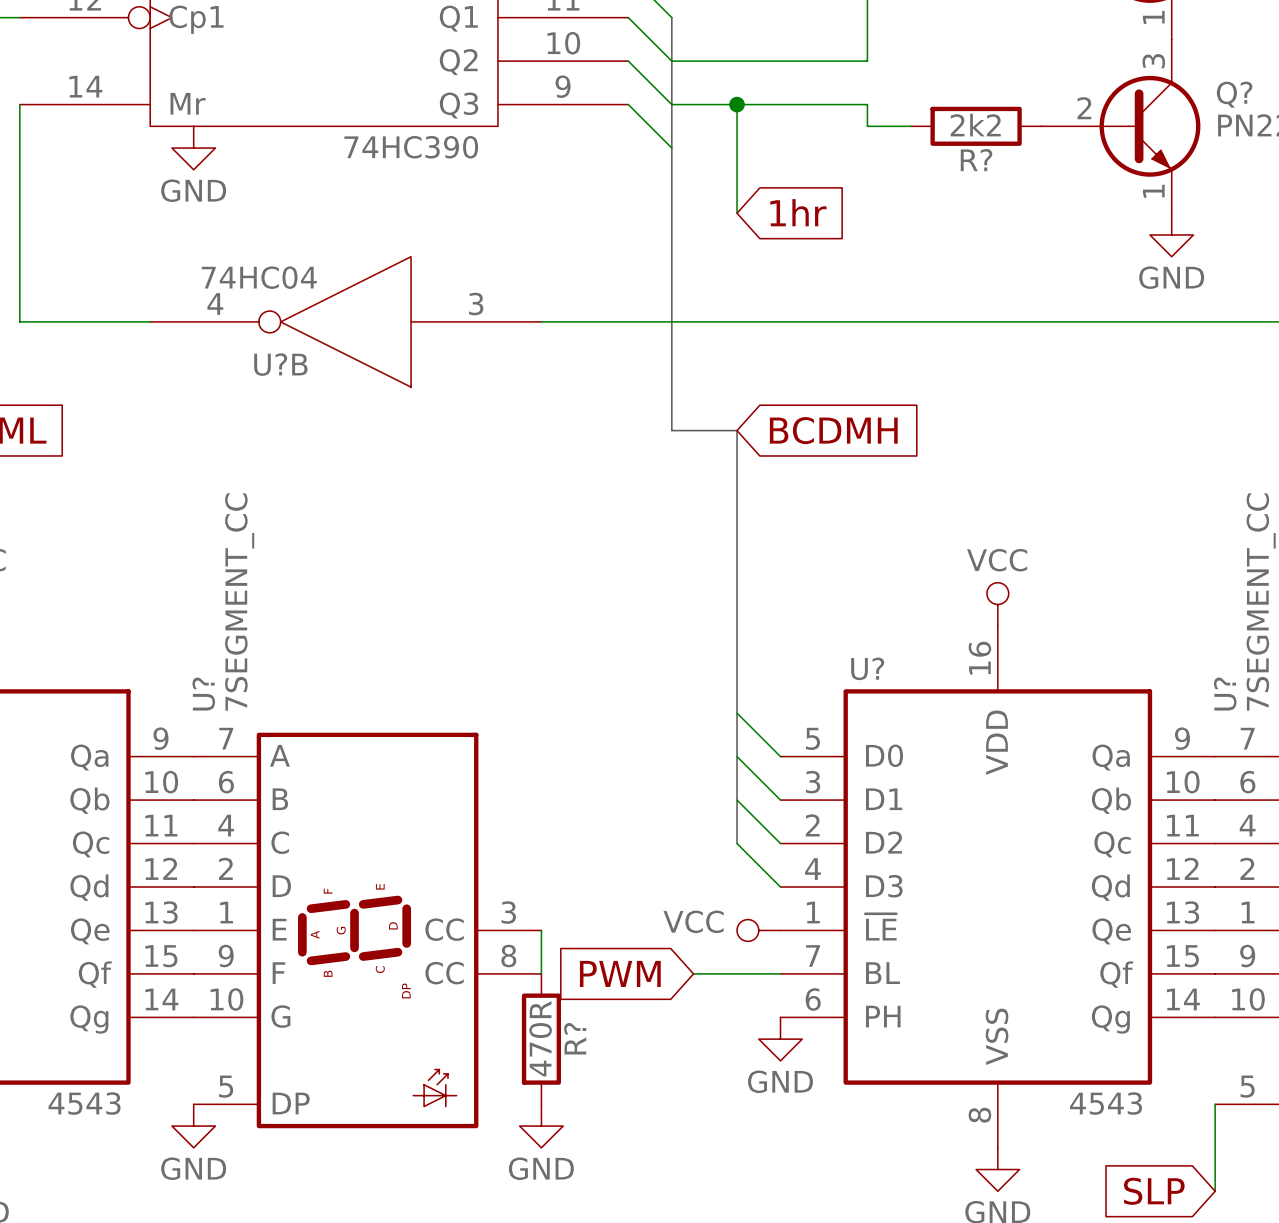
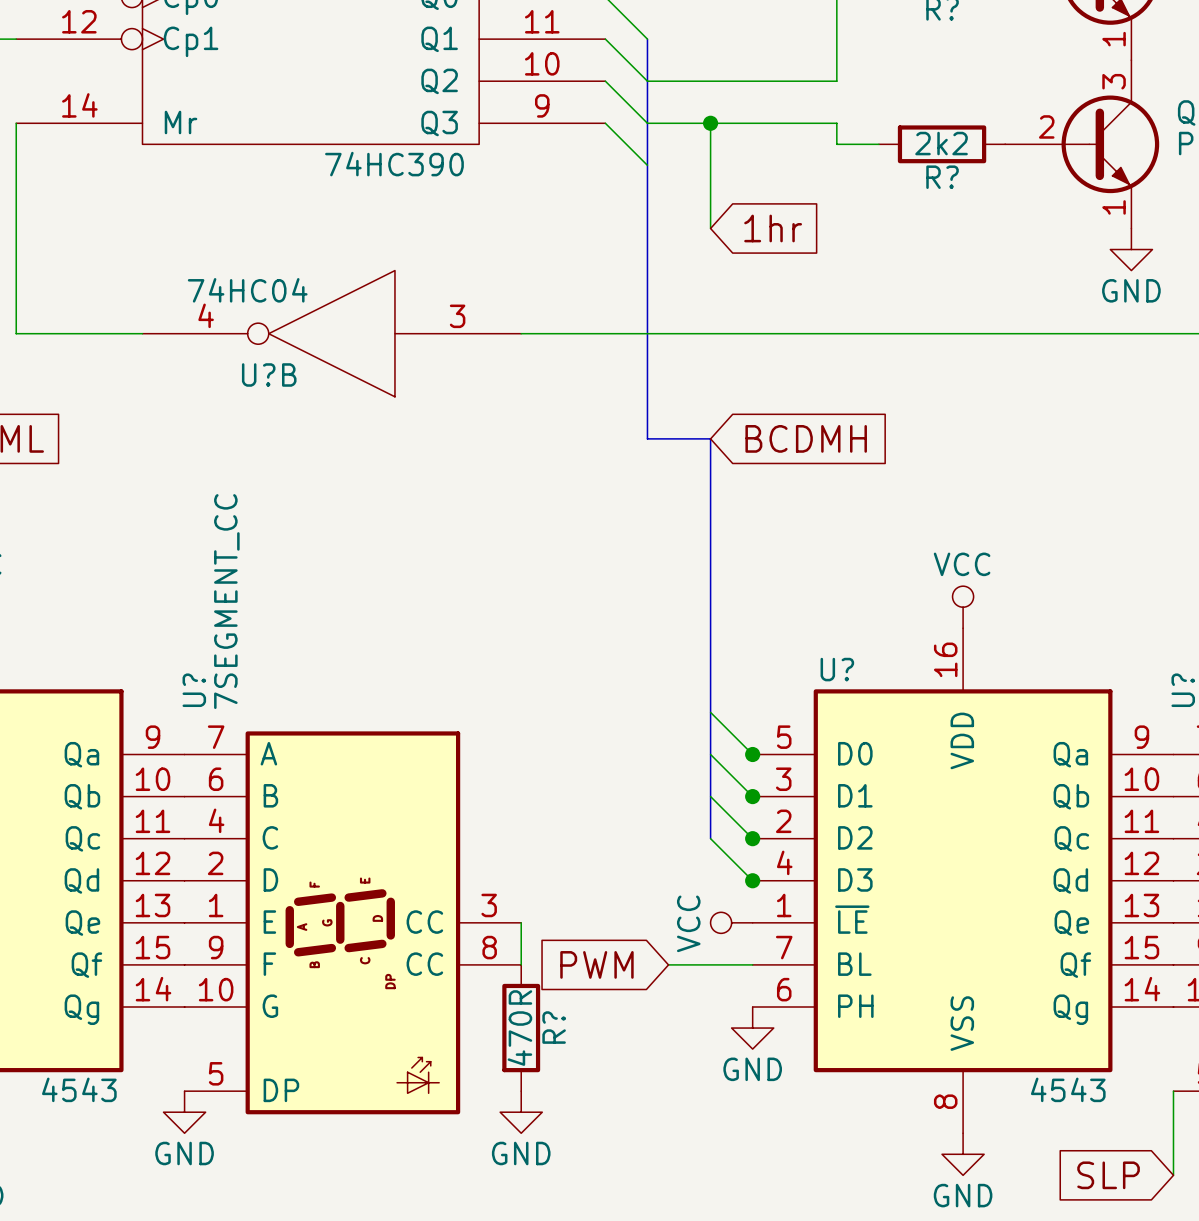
power symbol: GND (193, 148) -> none
junction: none -> (752, 754)
junction: none -> (752, 796)
junction: none -> (752, 838)
junction: none -> (752, 880)
power symbol text rotation: 0° (693, 921) -> 90° counterclockwise (688, 923)

